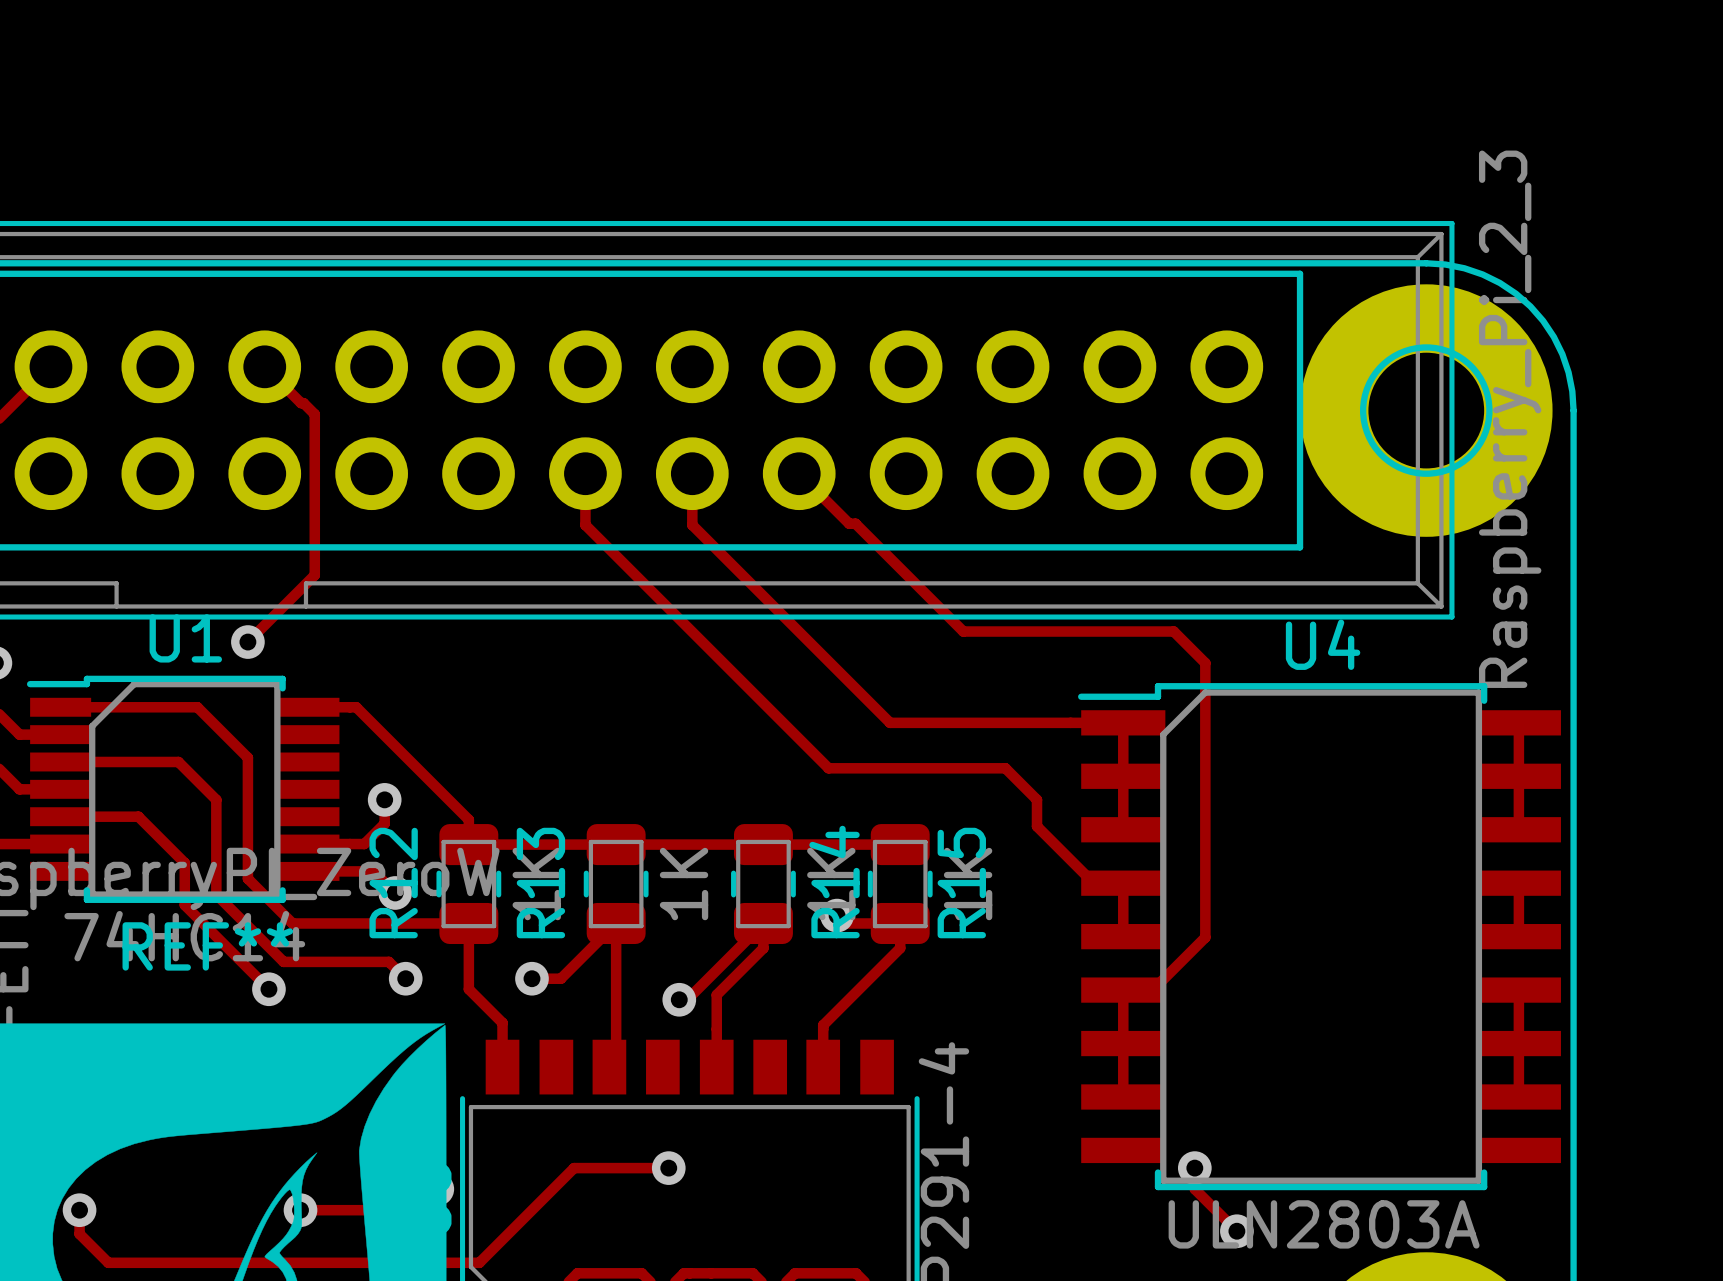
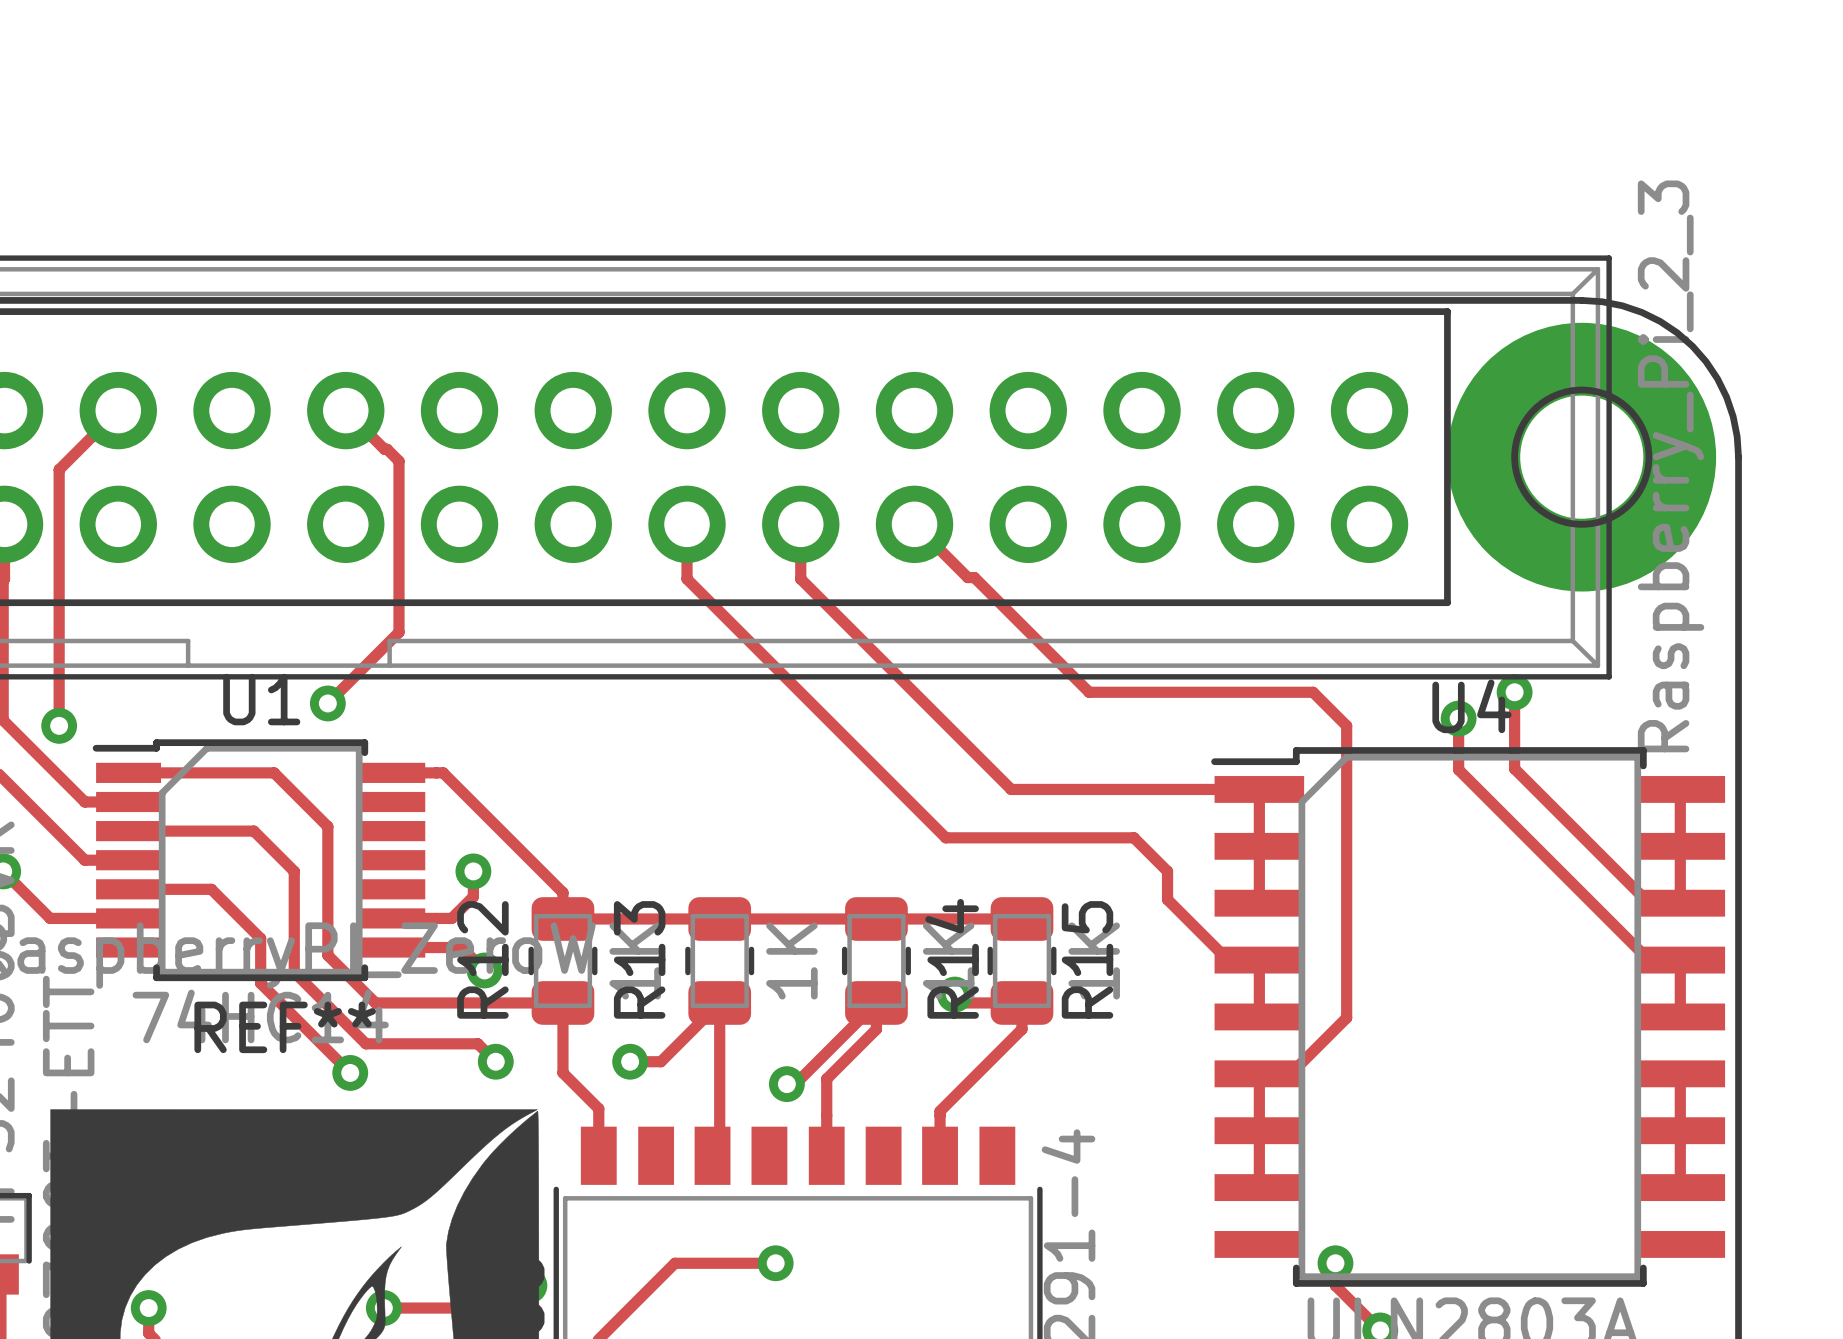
track: none -> (1514, 692) (1514, 768) (1648, 903) (1680, 903)
via: none -> (1514, 692)
track: none -> (1458, 718) (1458, 769) (1648, 960) (1680, 960)
via: none -> (1458, 718)

